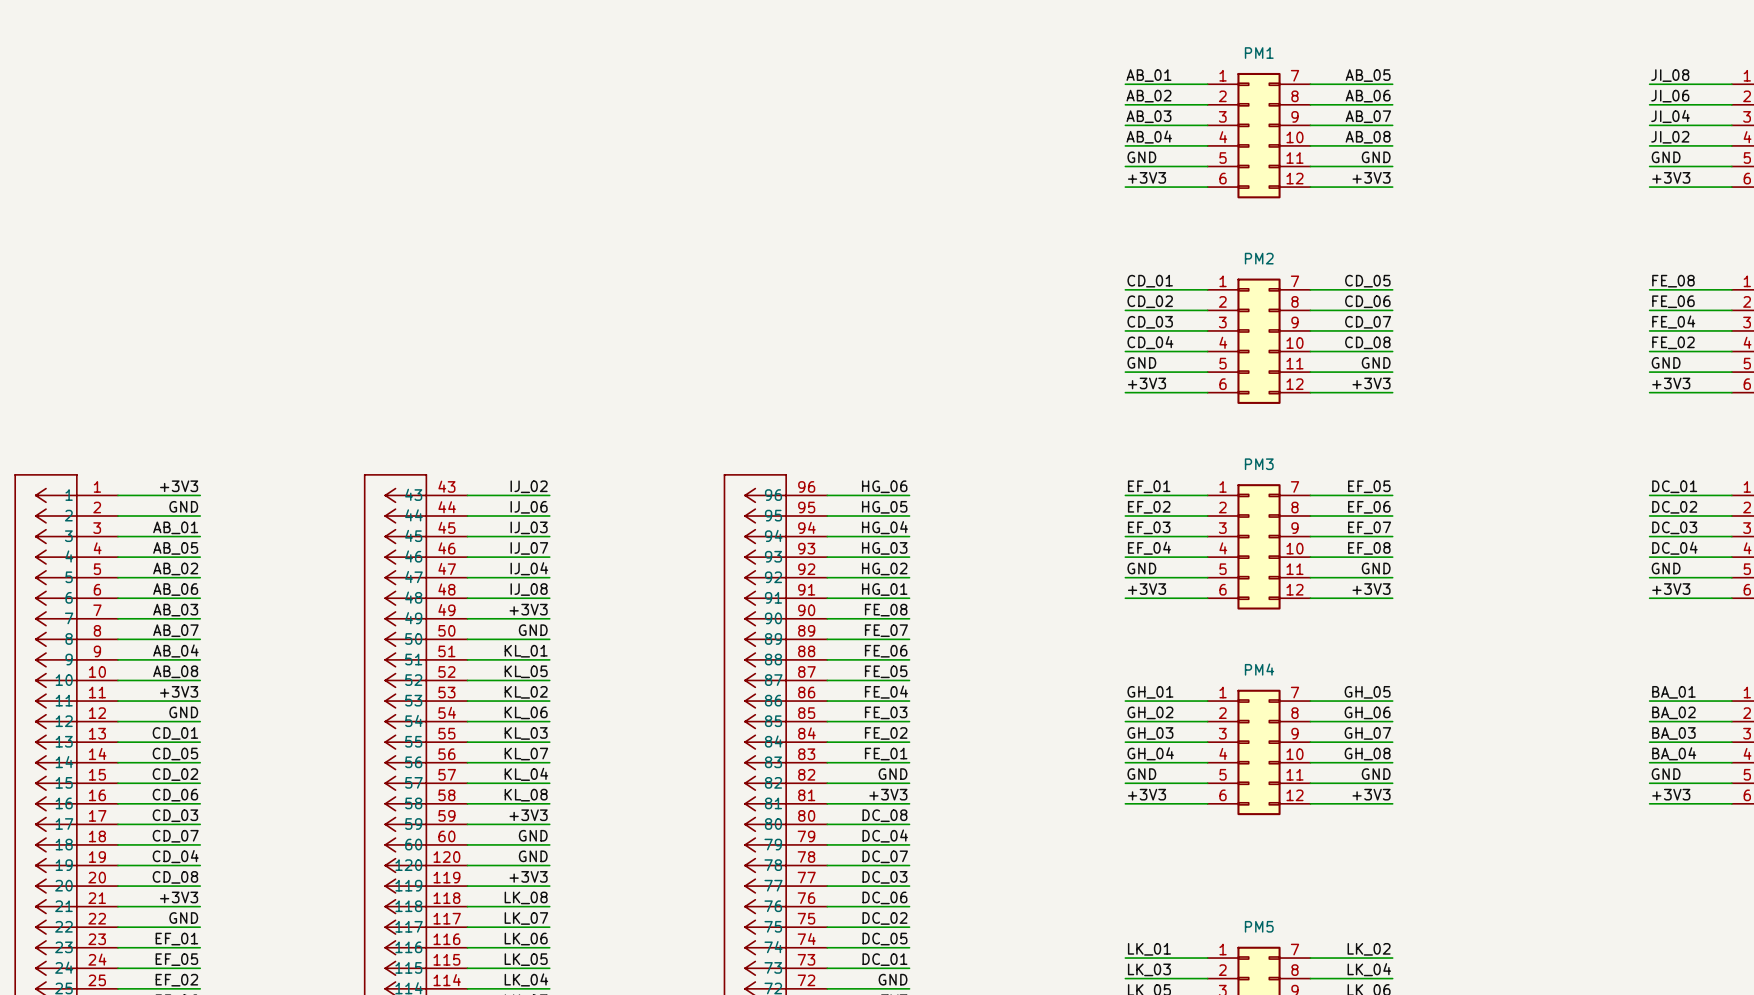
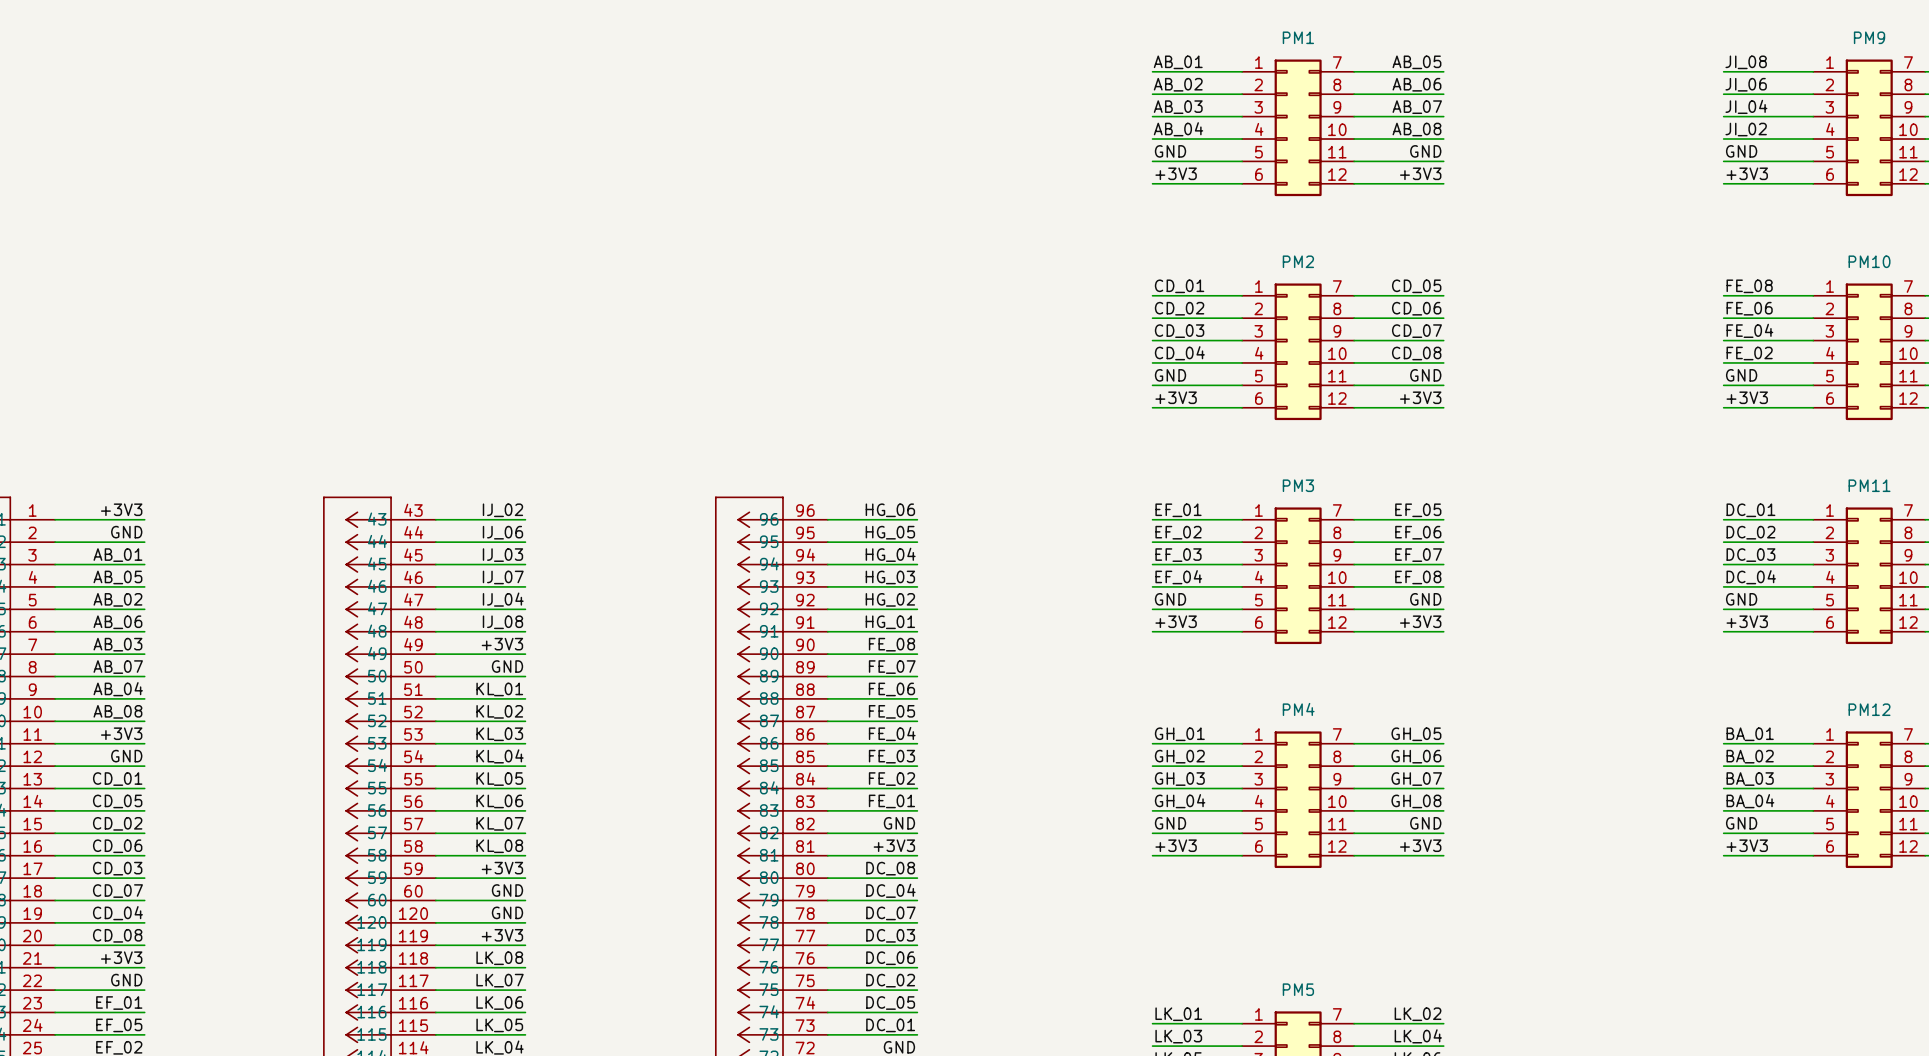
label: KL_05 (526, 671) -> KL_02 (499, 711)
label: KL_02 (526, 692) -> KL_03 (499, 734)
label: KL_06 (526, 712) -> KL_04 (500, 756)
label: KL_03 (526, 733) -> KL_05 (499, 779)
label: KL_07 (526, 754) -> KL_06 (499, 801)
label: KL_04 (526, 774) -> KL_07 (500, 823)

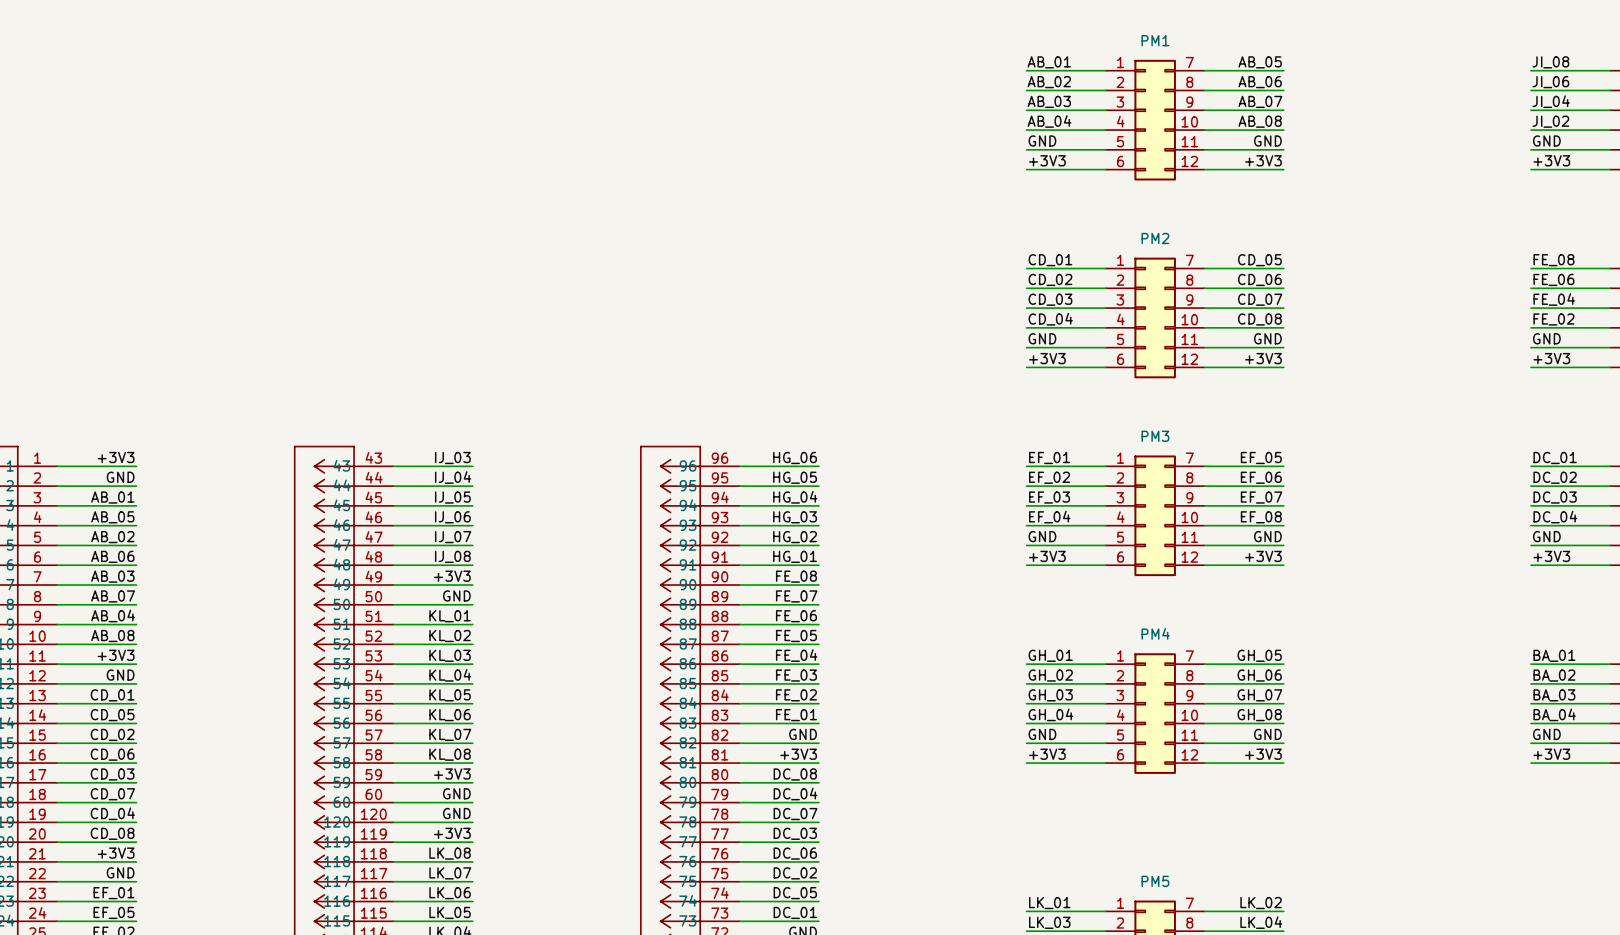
label: IJ_02 (502, 510) -> IJ_03 (452, 457)
label: IJ_06 (502, 532) -> IJ_04 (453, 477)
label: IJ_03 (502, 555) -> IJ_05 (452, 497)
label: IJ_07 (503, 577) -> IJ_06 (452, 517)
label: IJ_04 (503, 599) -> IJ_07 (453, 537)

